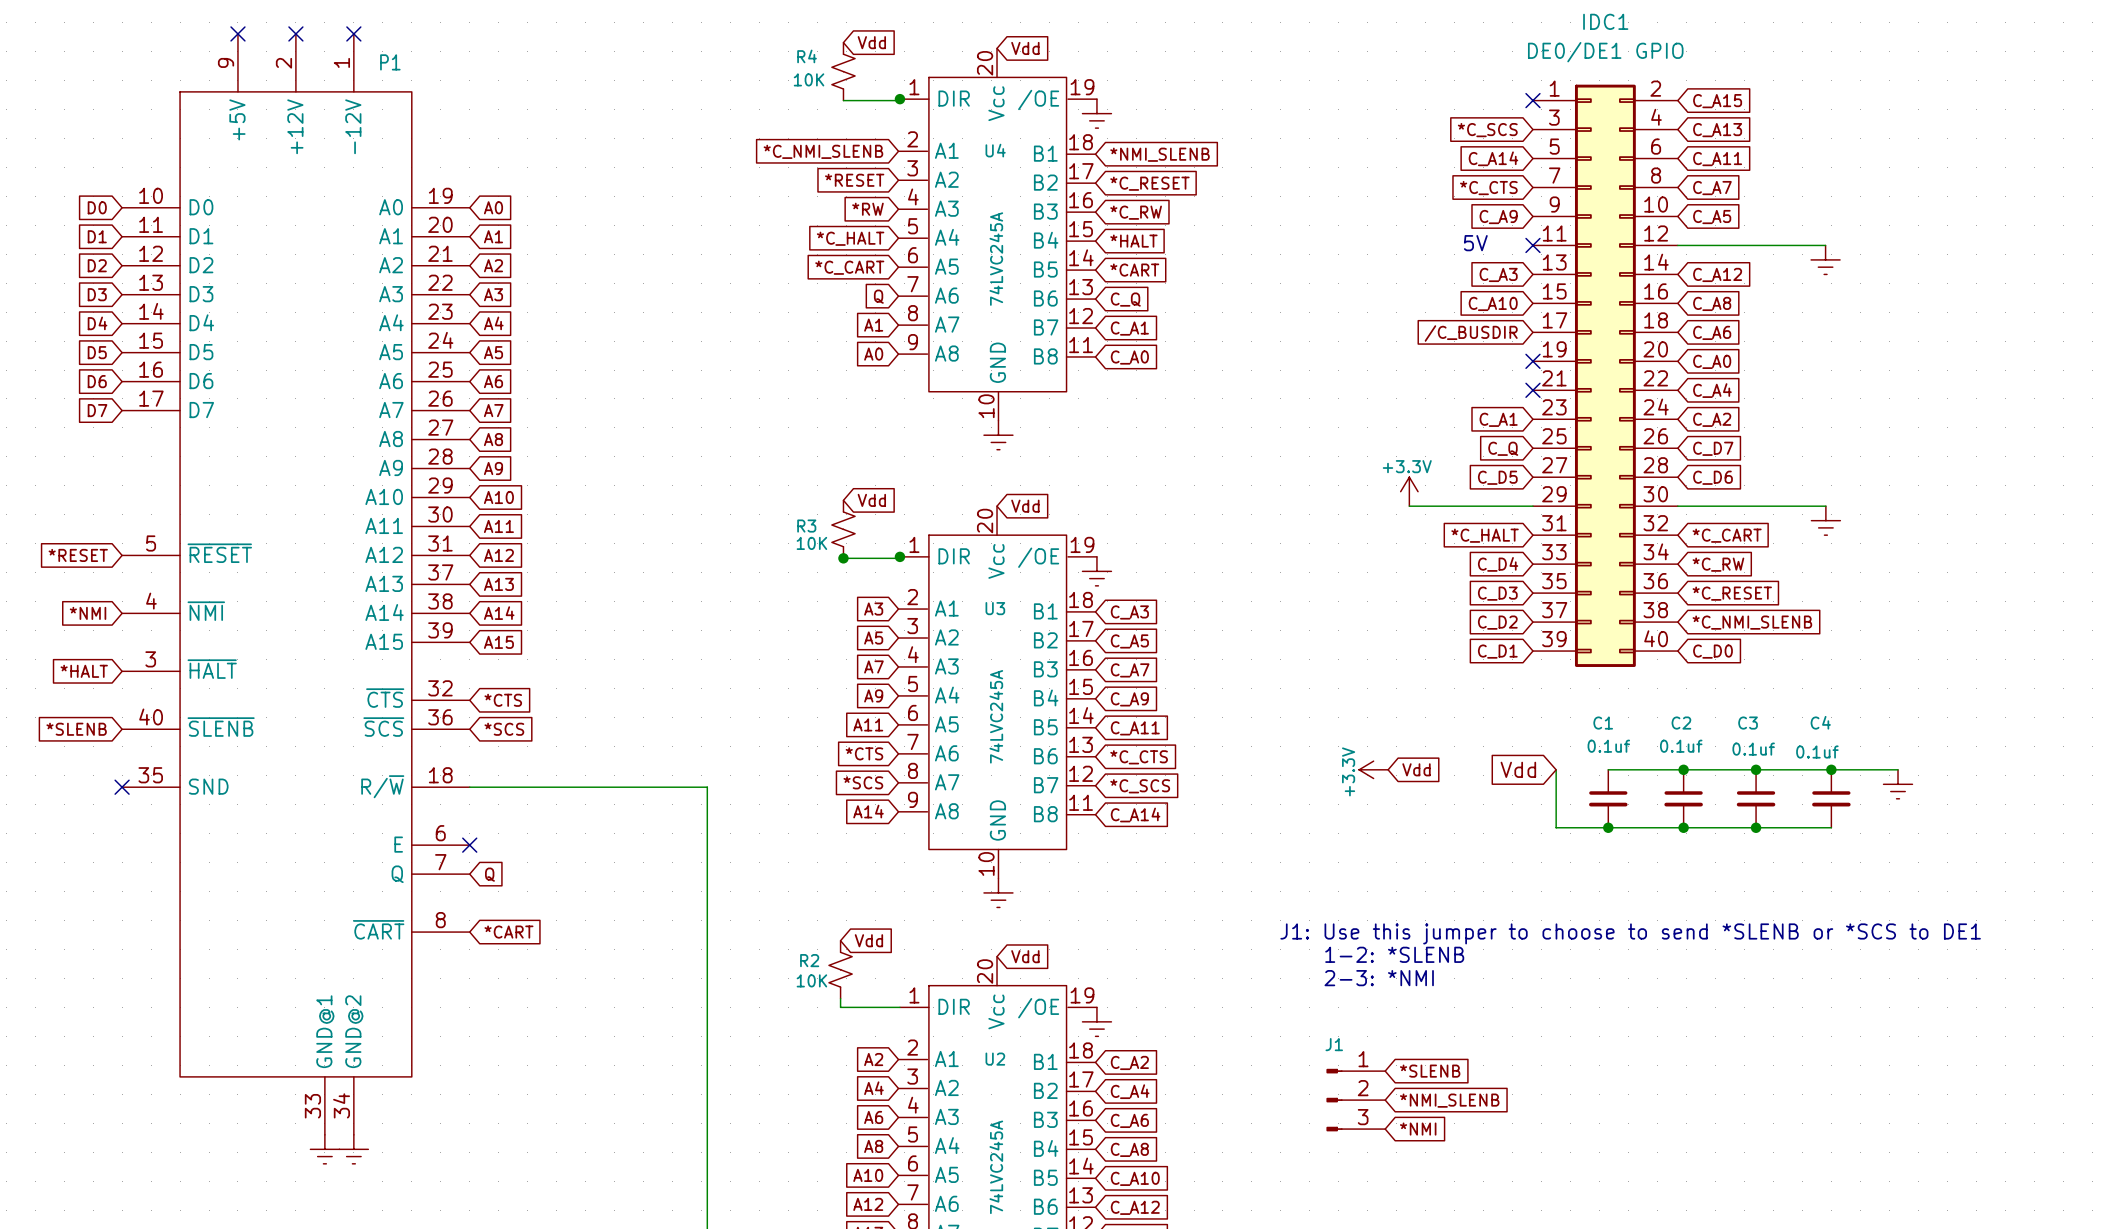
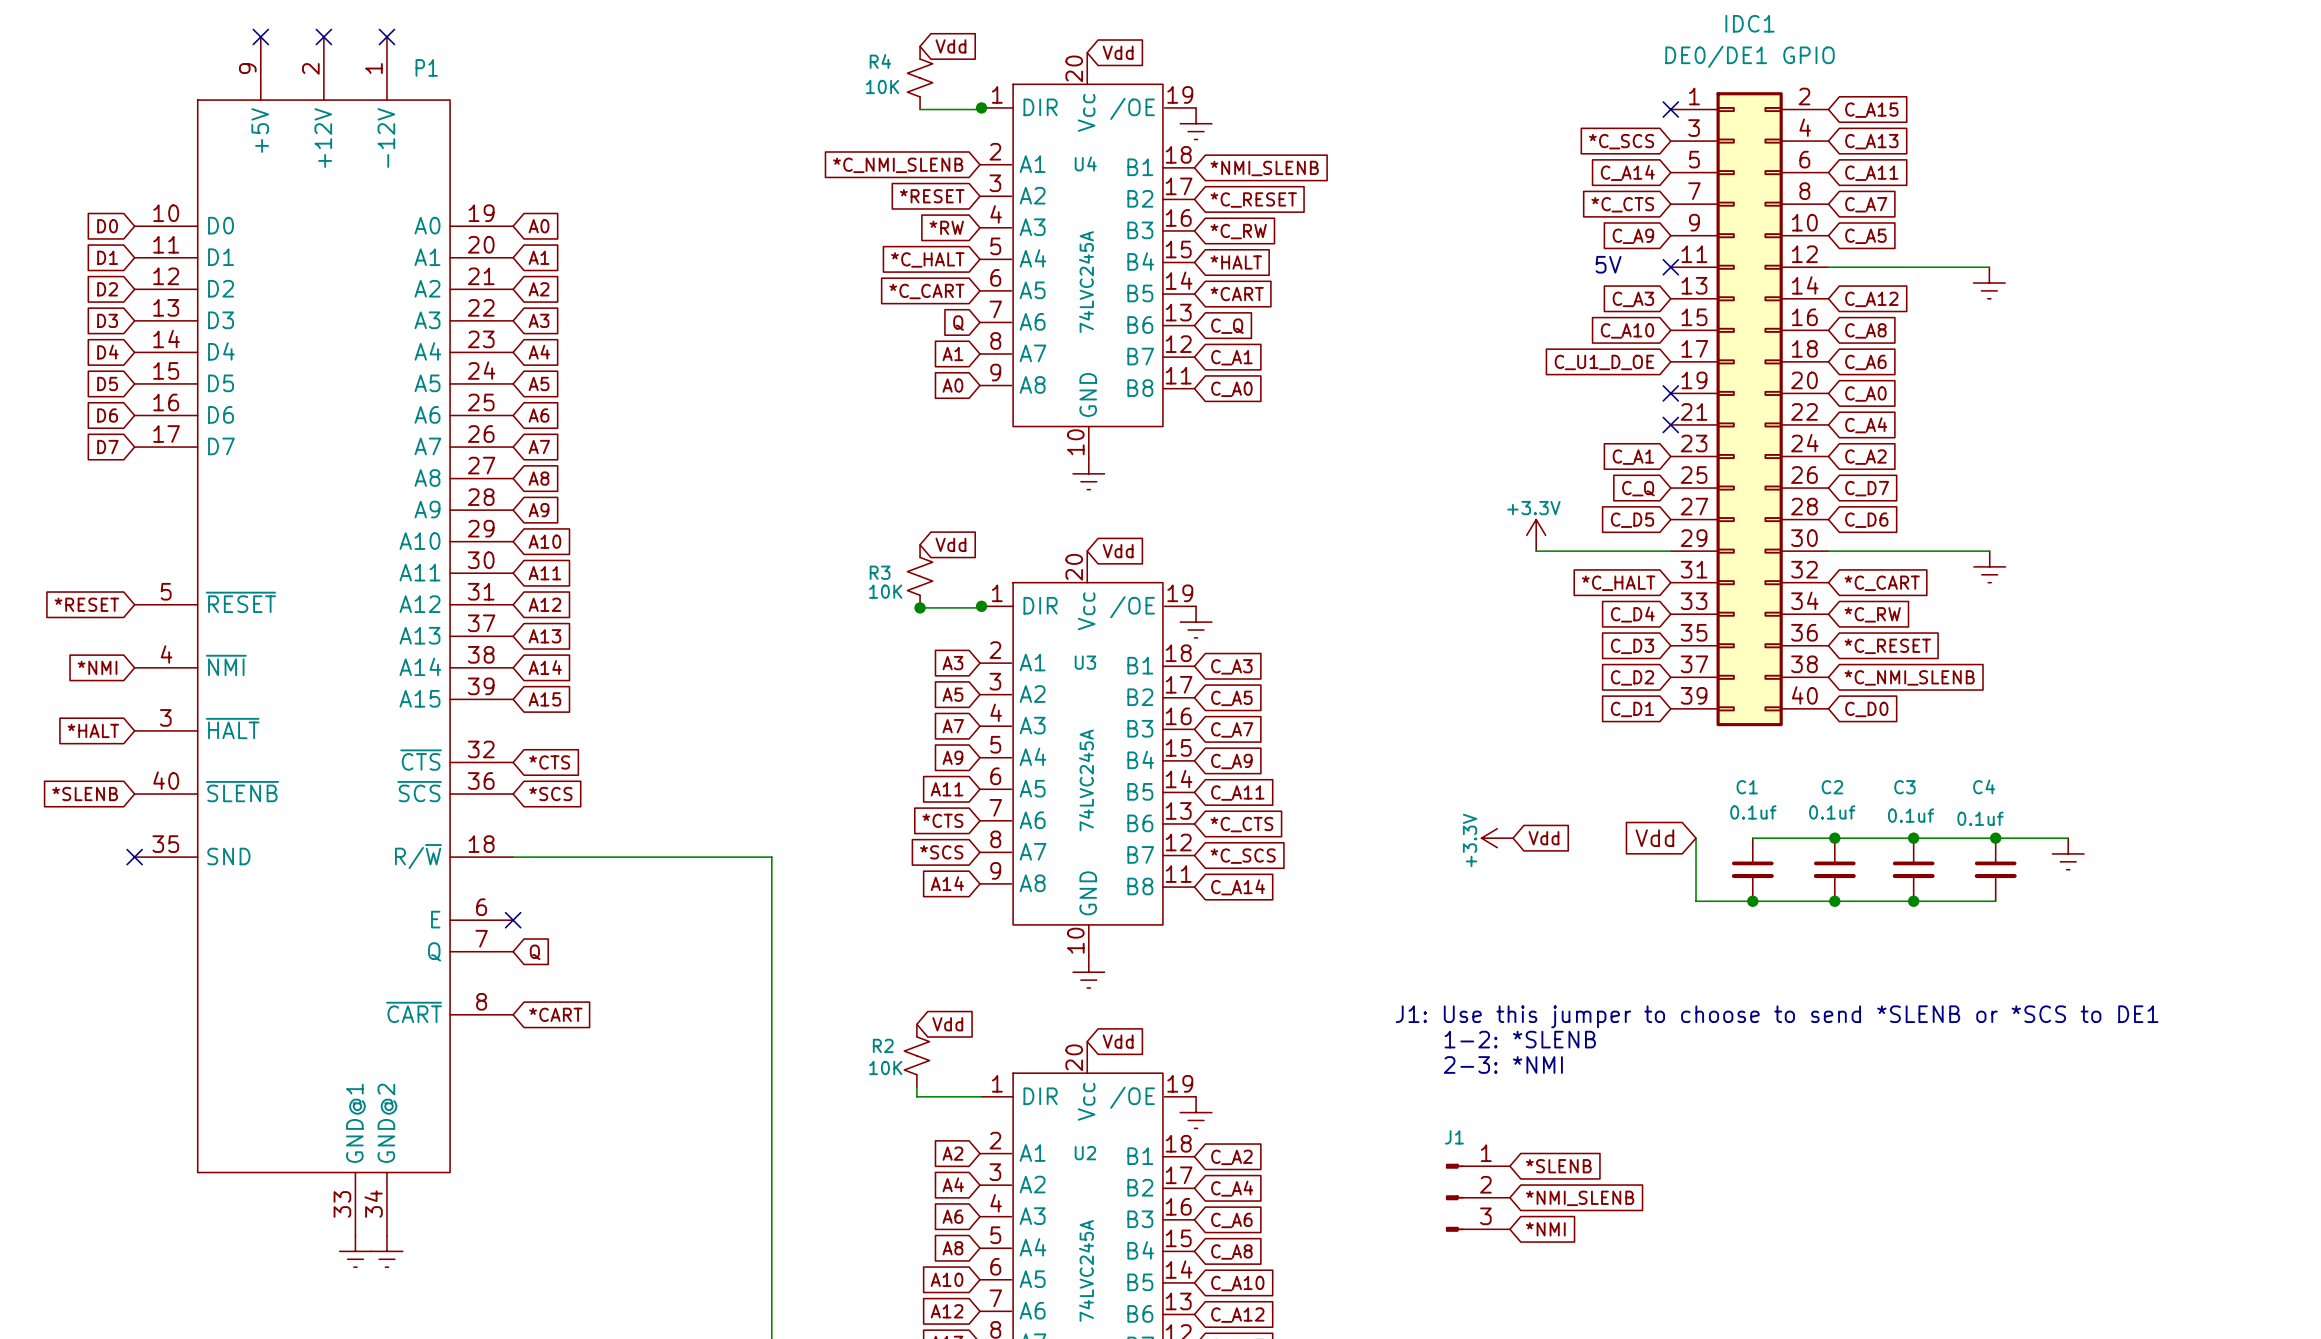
global label: /C_BUSDIR (1471, 333) -> C_U1_D_OE (1604, 362)

